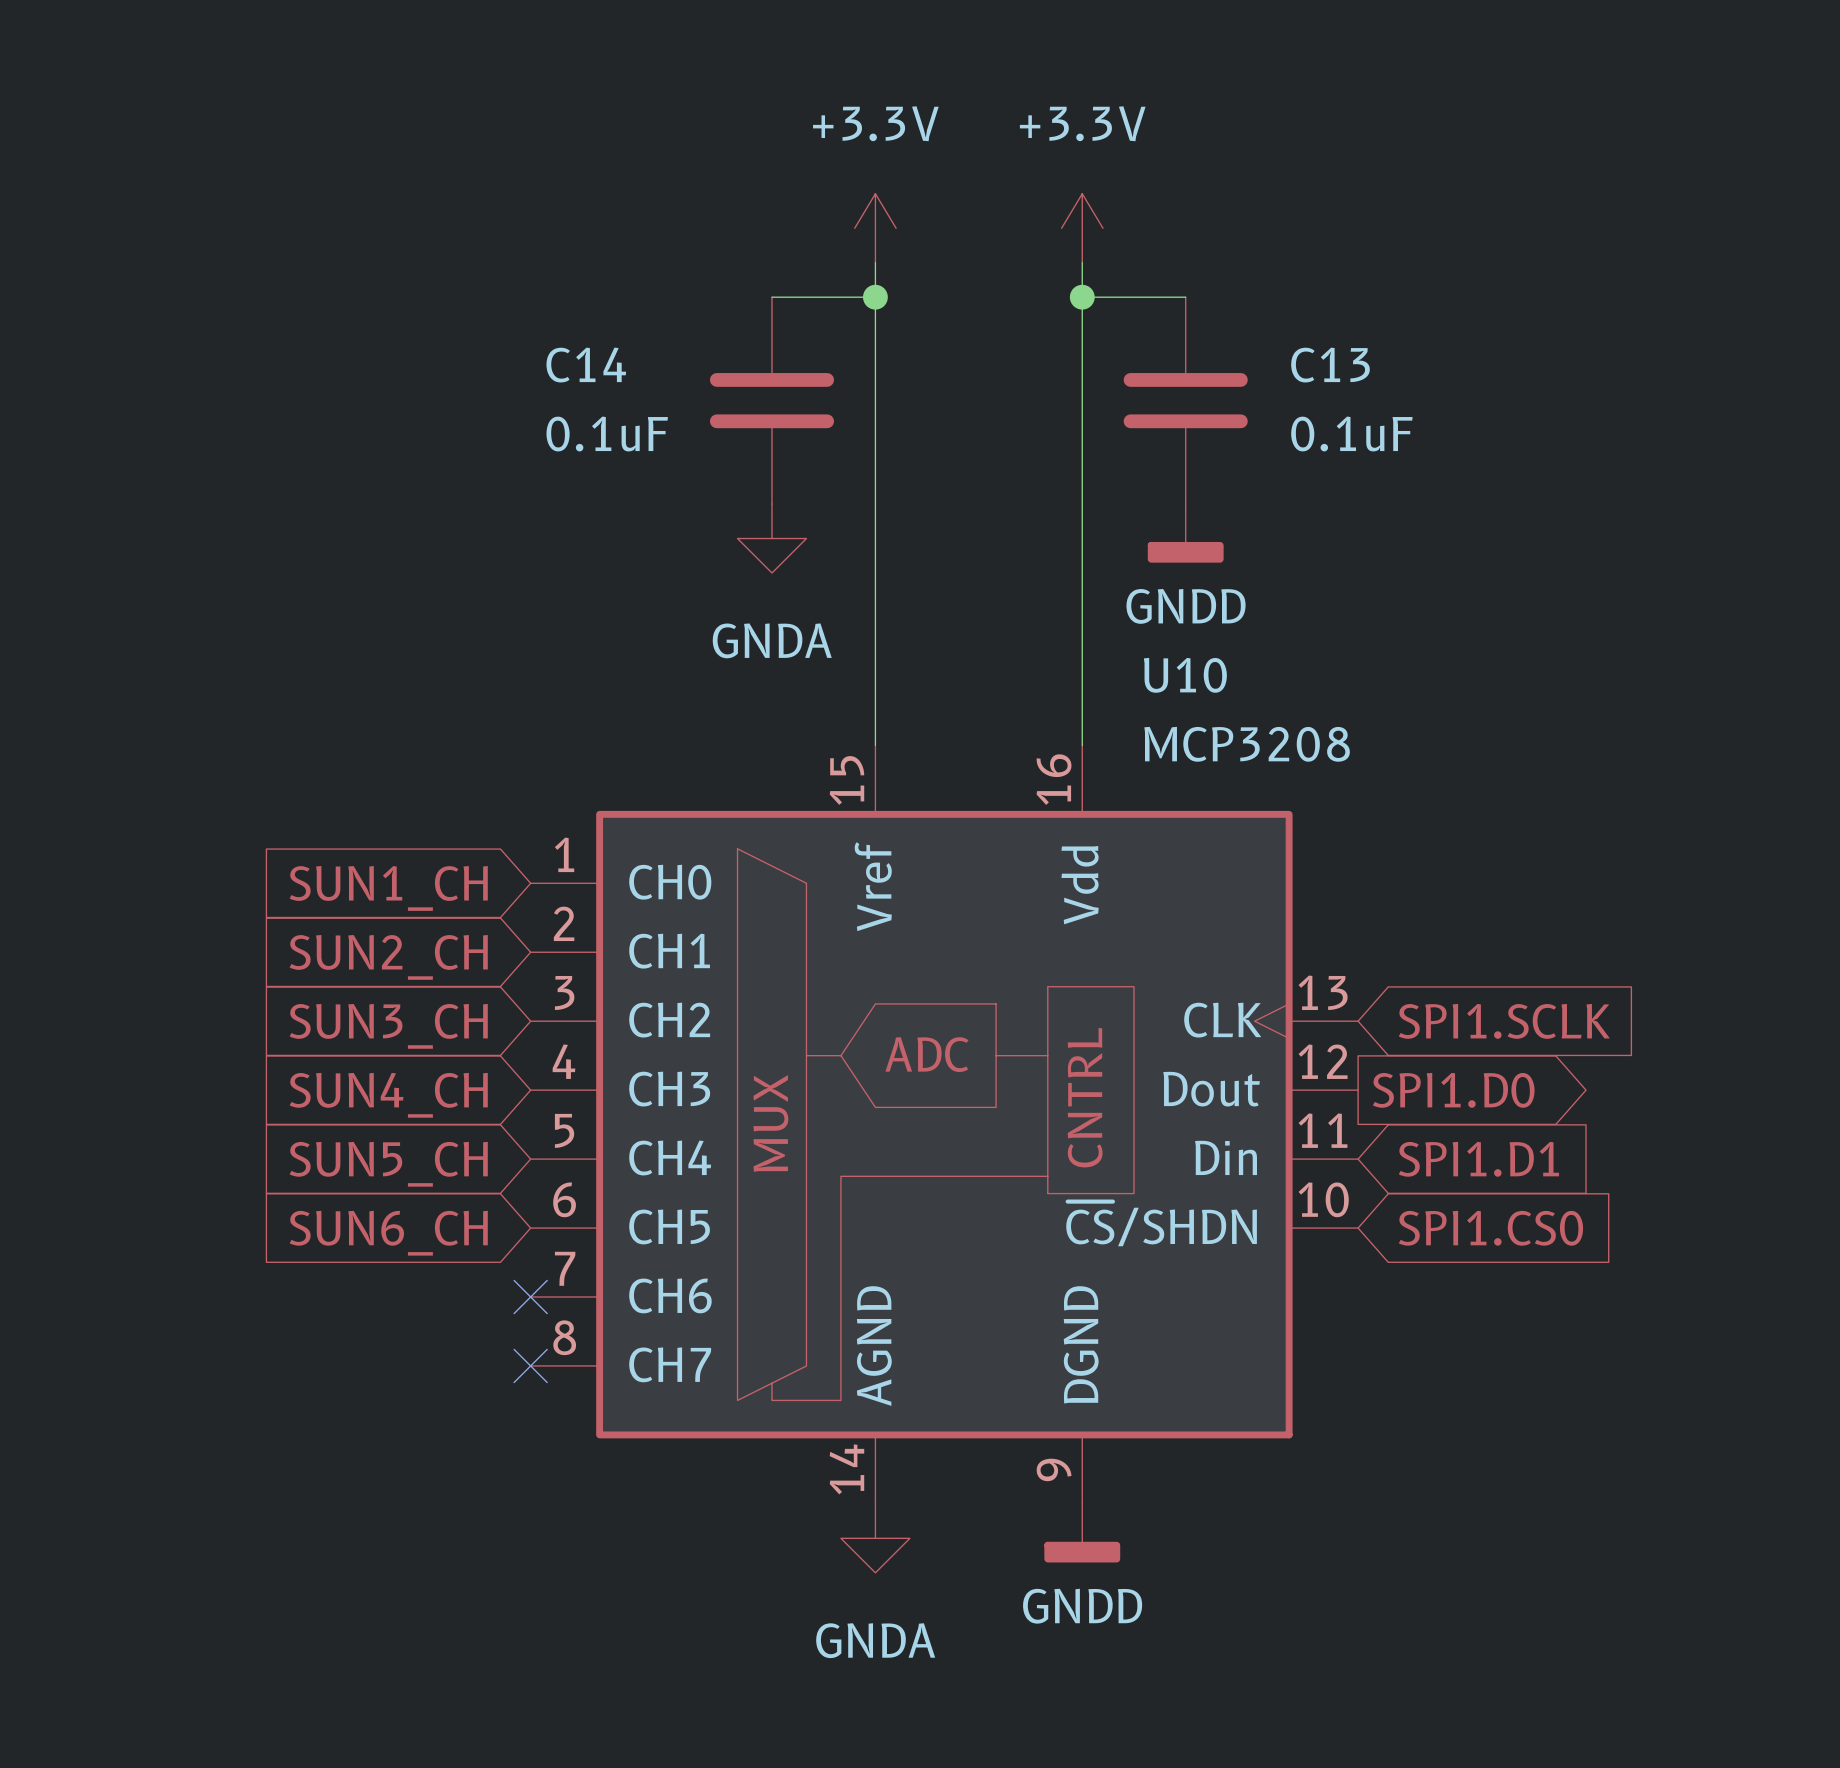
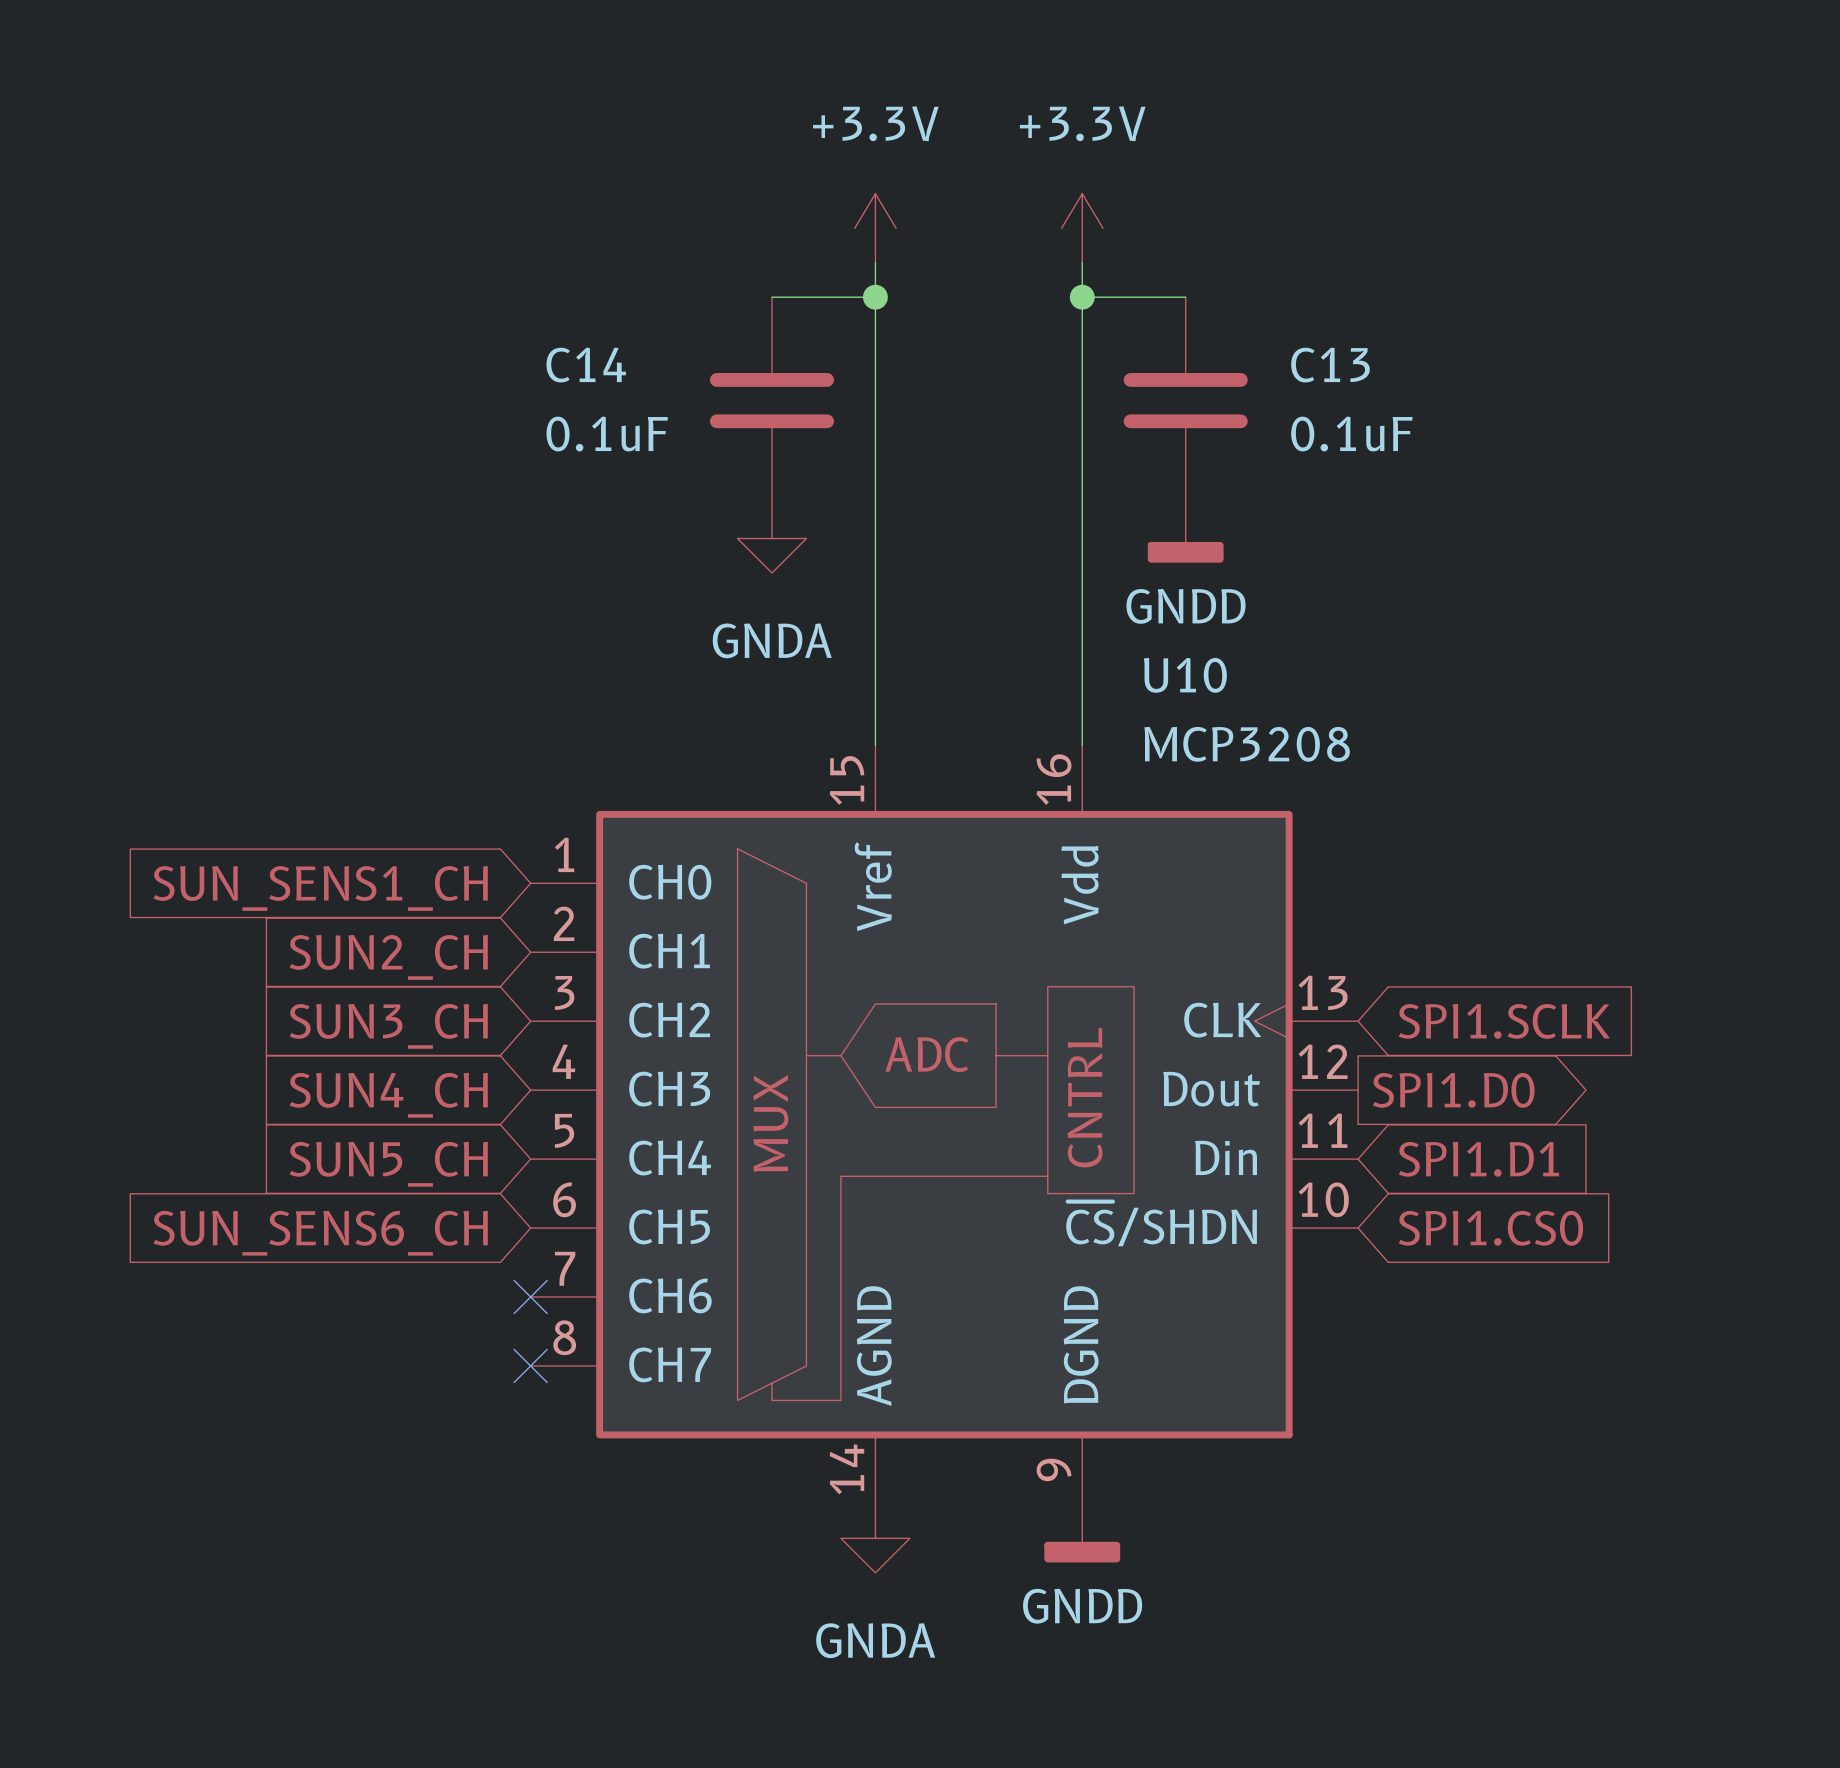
global label: SUN1_CH (388, 888) -> SUN_SENS1_CH (320, 888)
global label: SUN6_CH (388, 1233) -> SUN_SENS6_CH (320, 1233)

